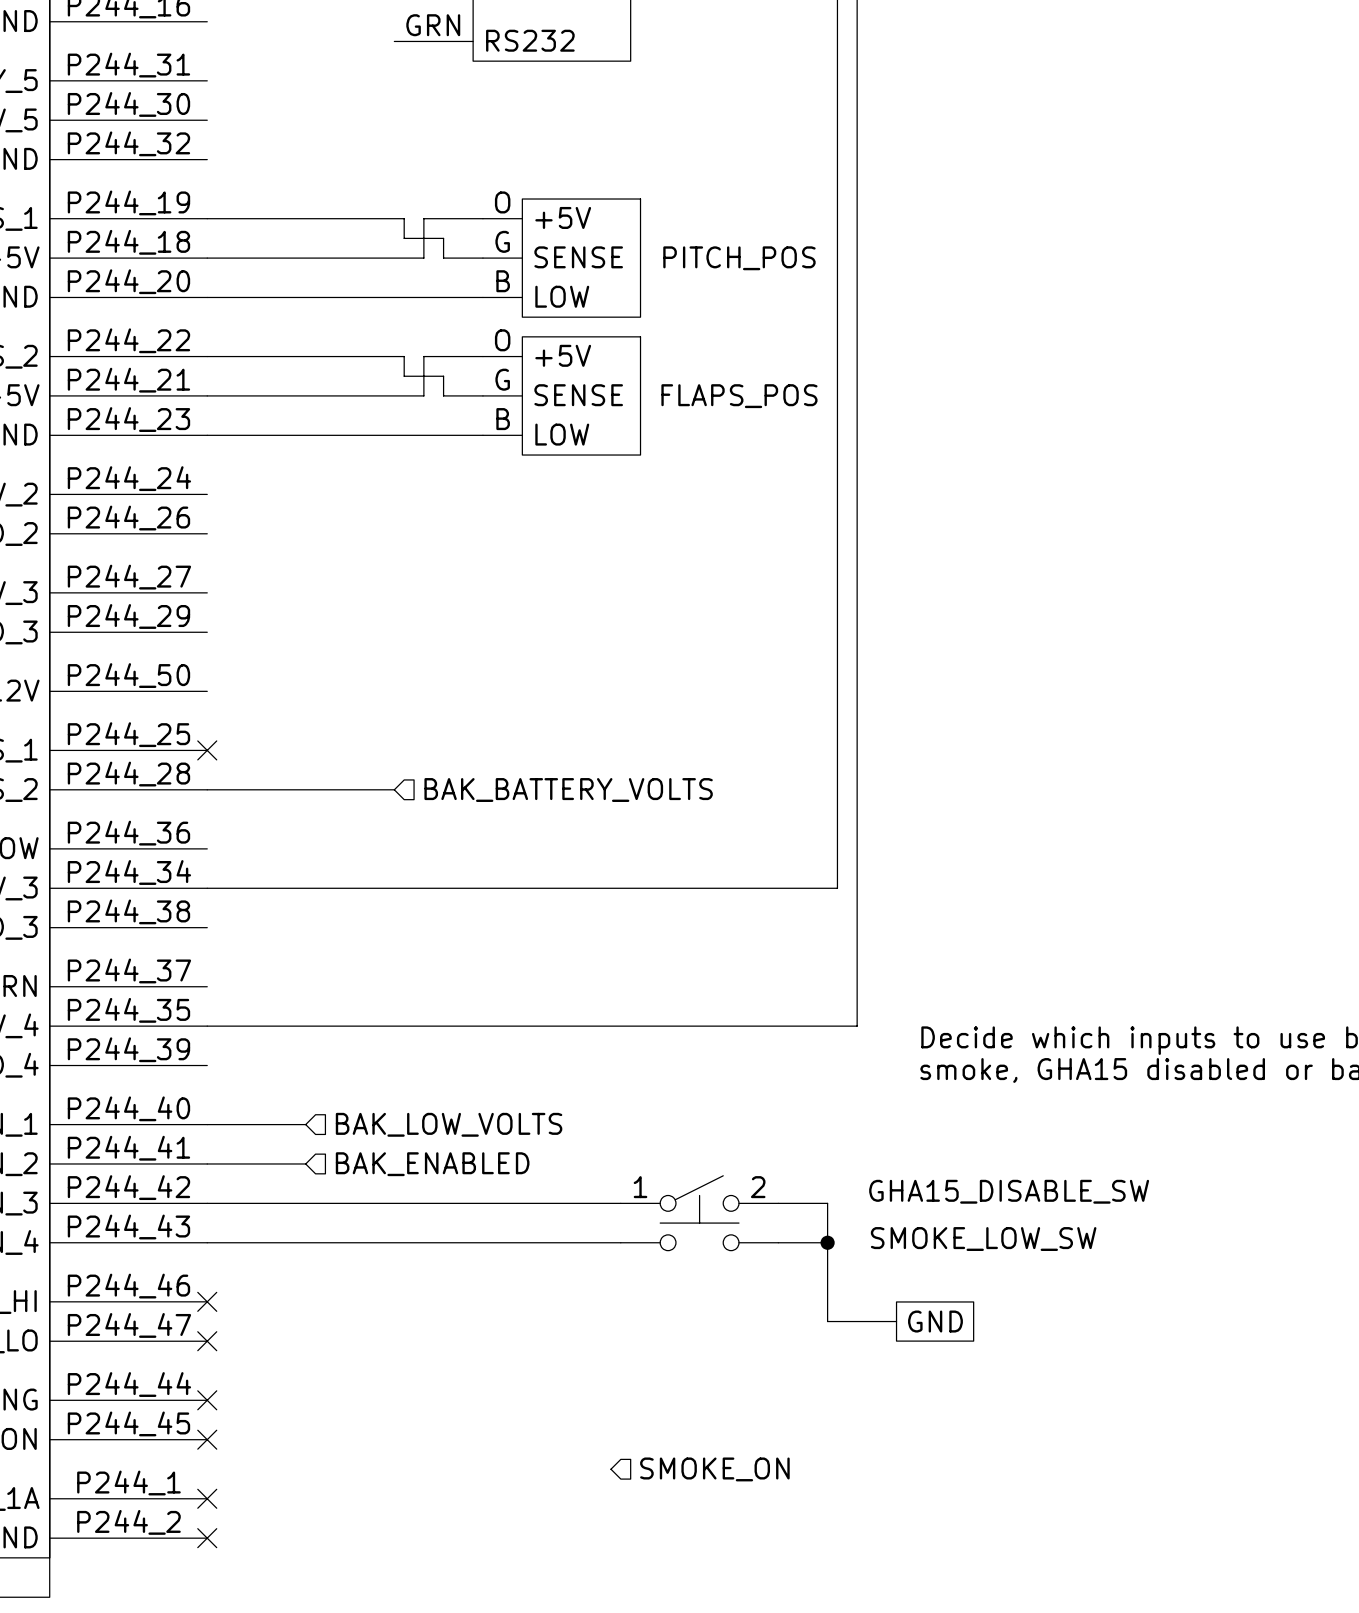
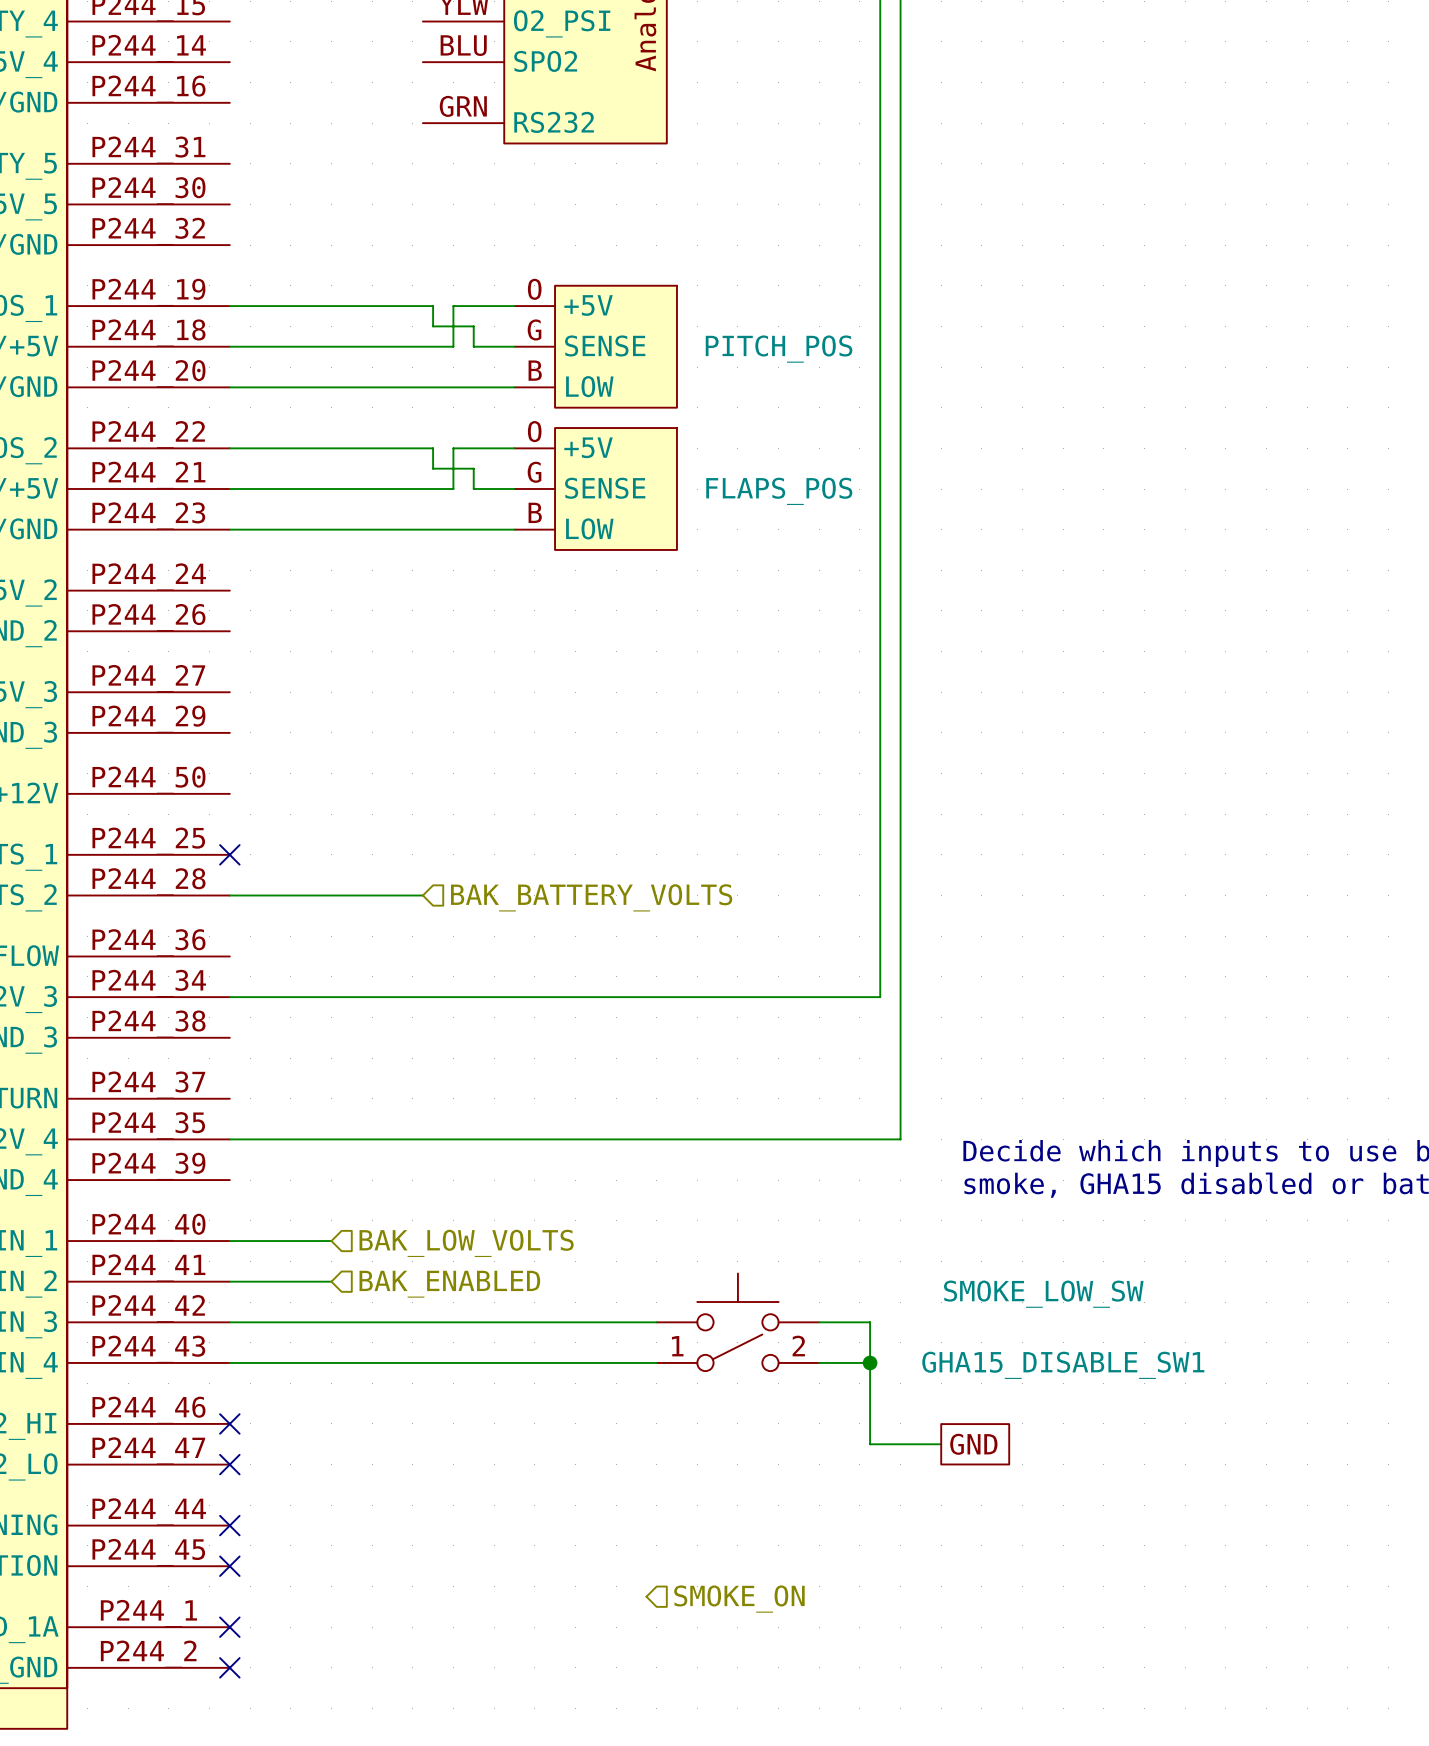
GHA15_DISABLE_SW: (699, 1193) -> none
SMOKE_LOW_SW position: (699, 1223) -> (737, 1302)
GHA15_DISABLE_SW1: none -> (737, 1352)
SMOKE_LOW_SW name position: SMOKE_LOW_SW (983, 1239) -> SMOKE_LOW_SW (1043, 1294)

